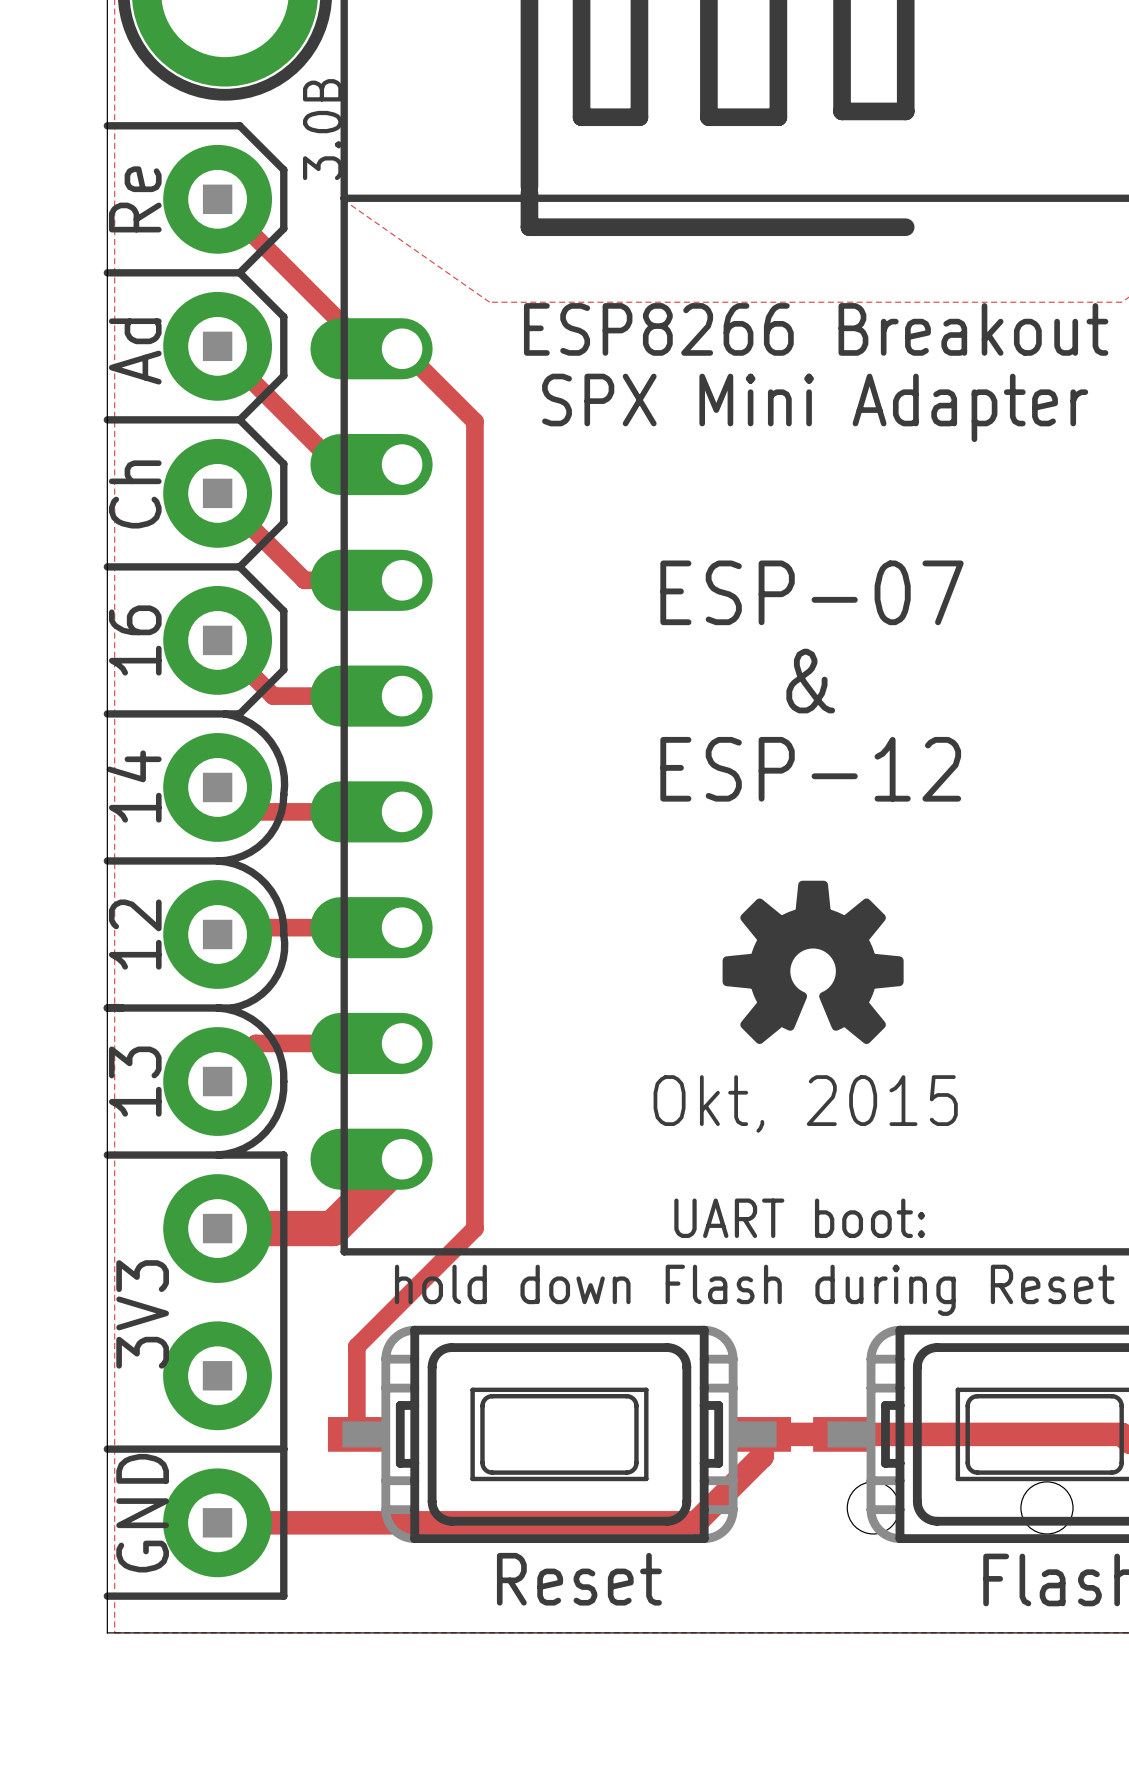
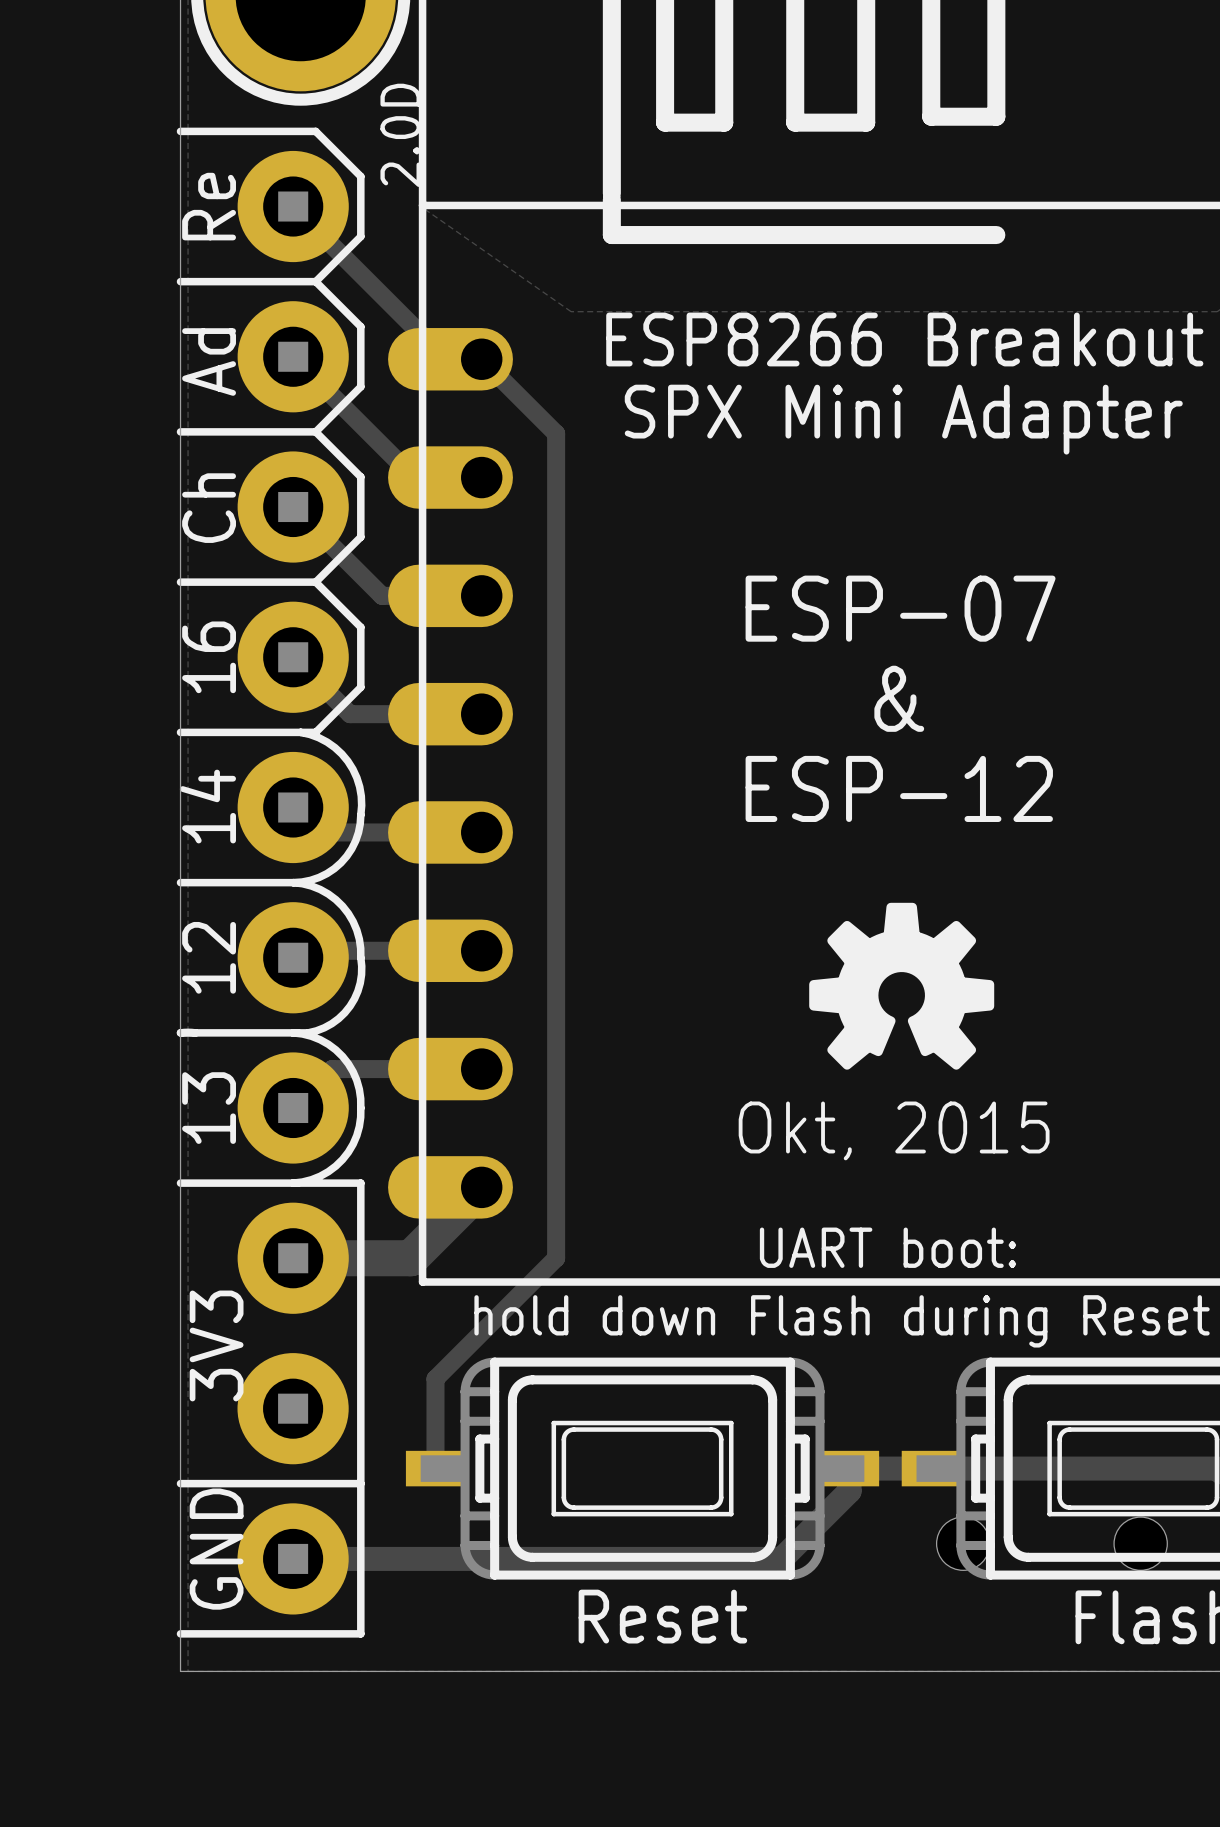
text: 3.0B (322, 129) -> 2.0D (400, 135)

